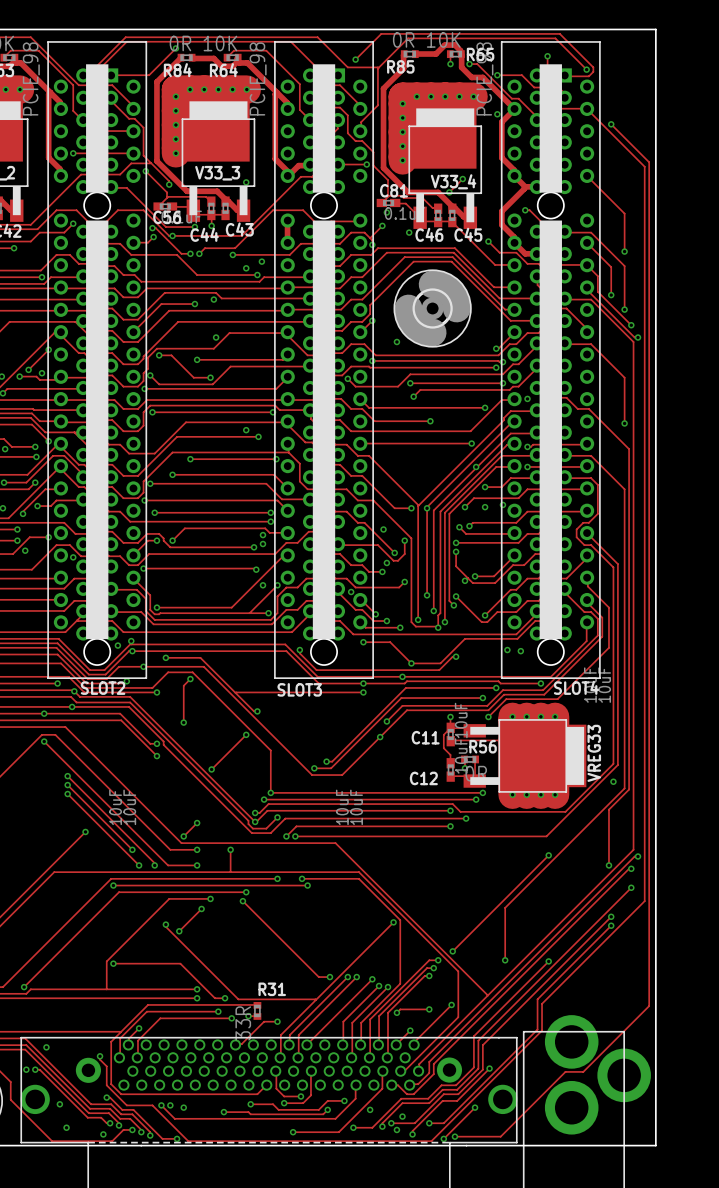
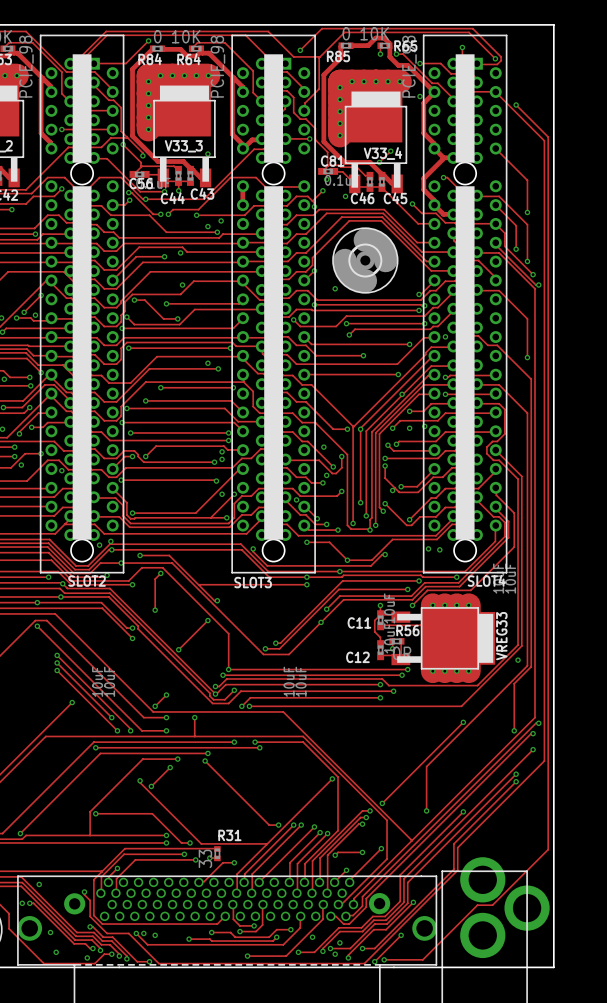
R85 value: 0R (403, 39) -> 0 (346, 33)
R84 value: 0R (180, 43) -> 0 (157, 36)
R31 value: 33R (243, 1023) -> 33 (205, 858)

